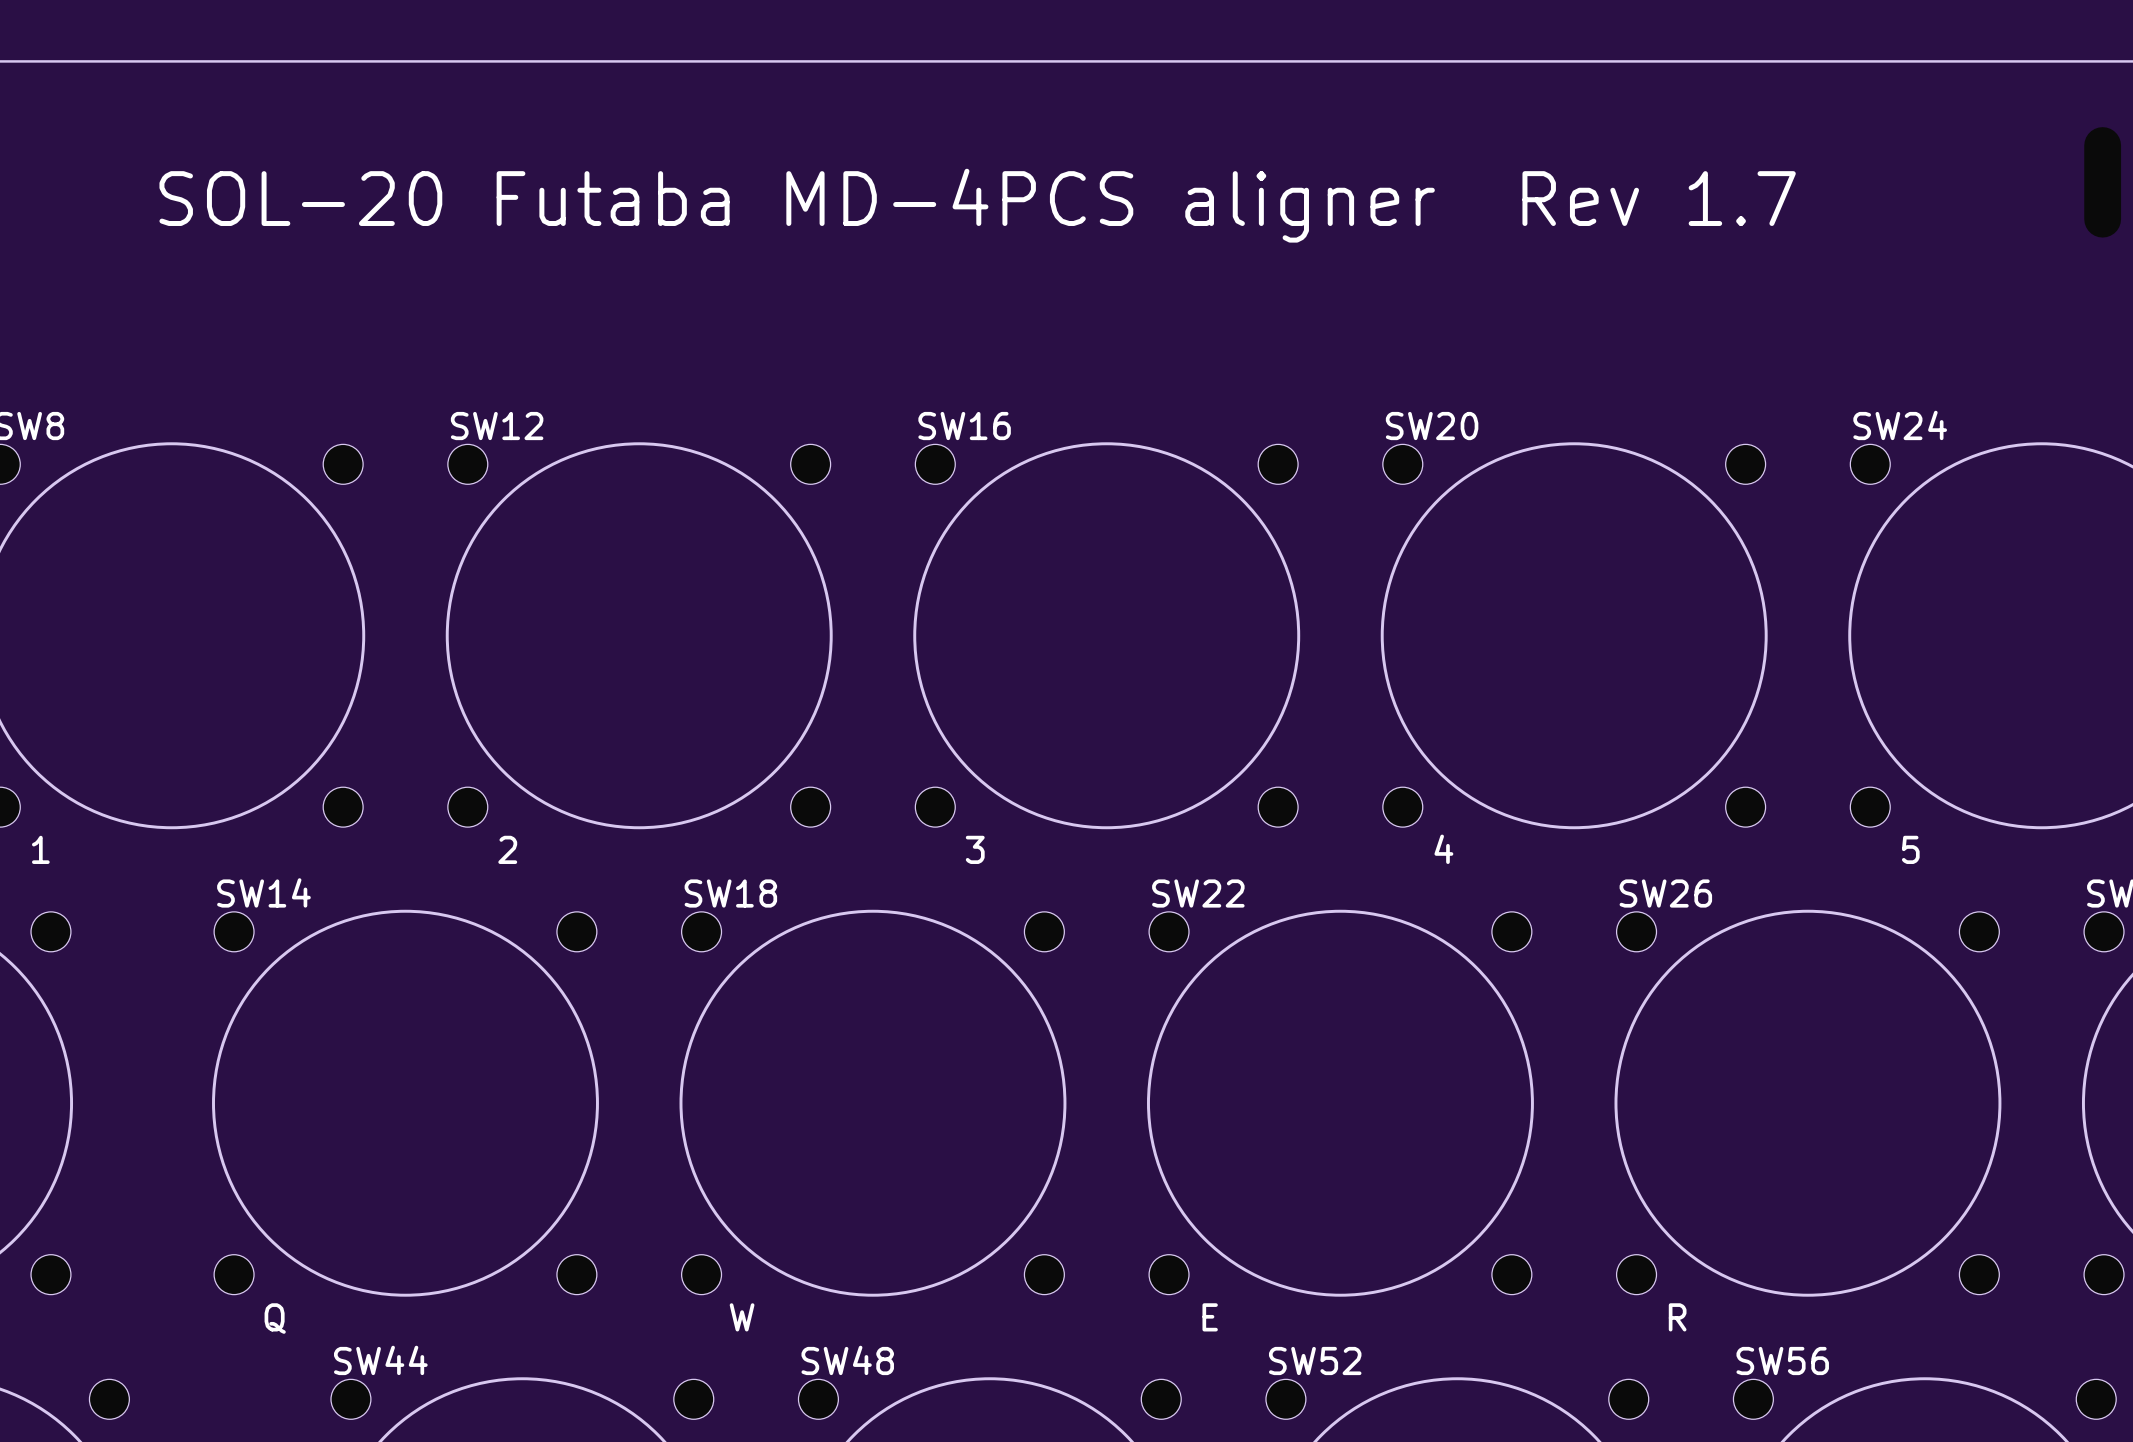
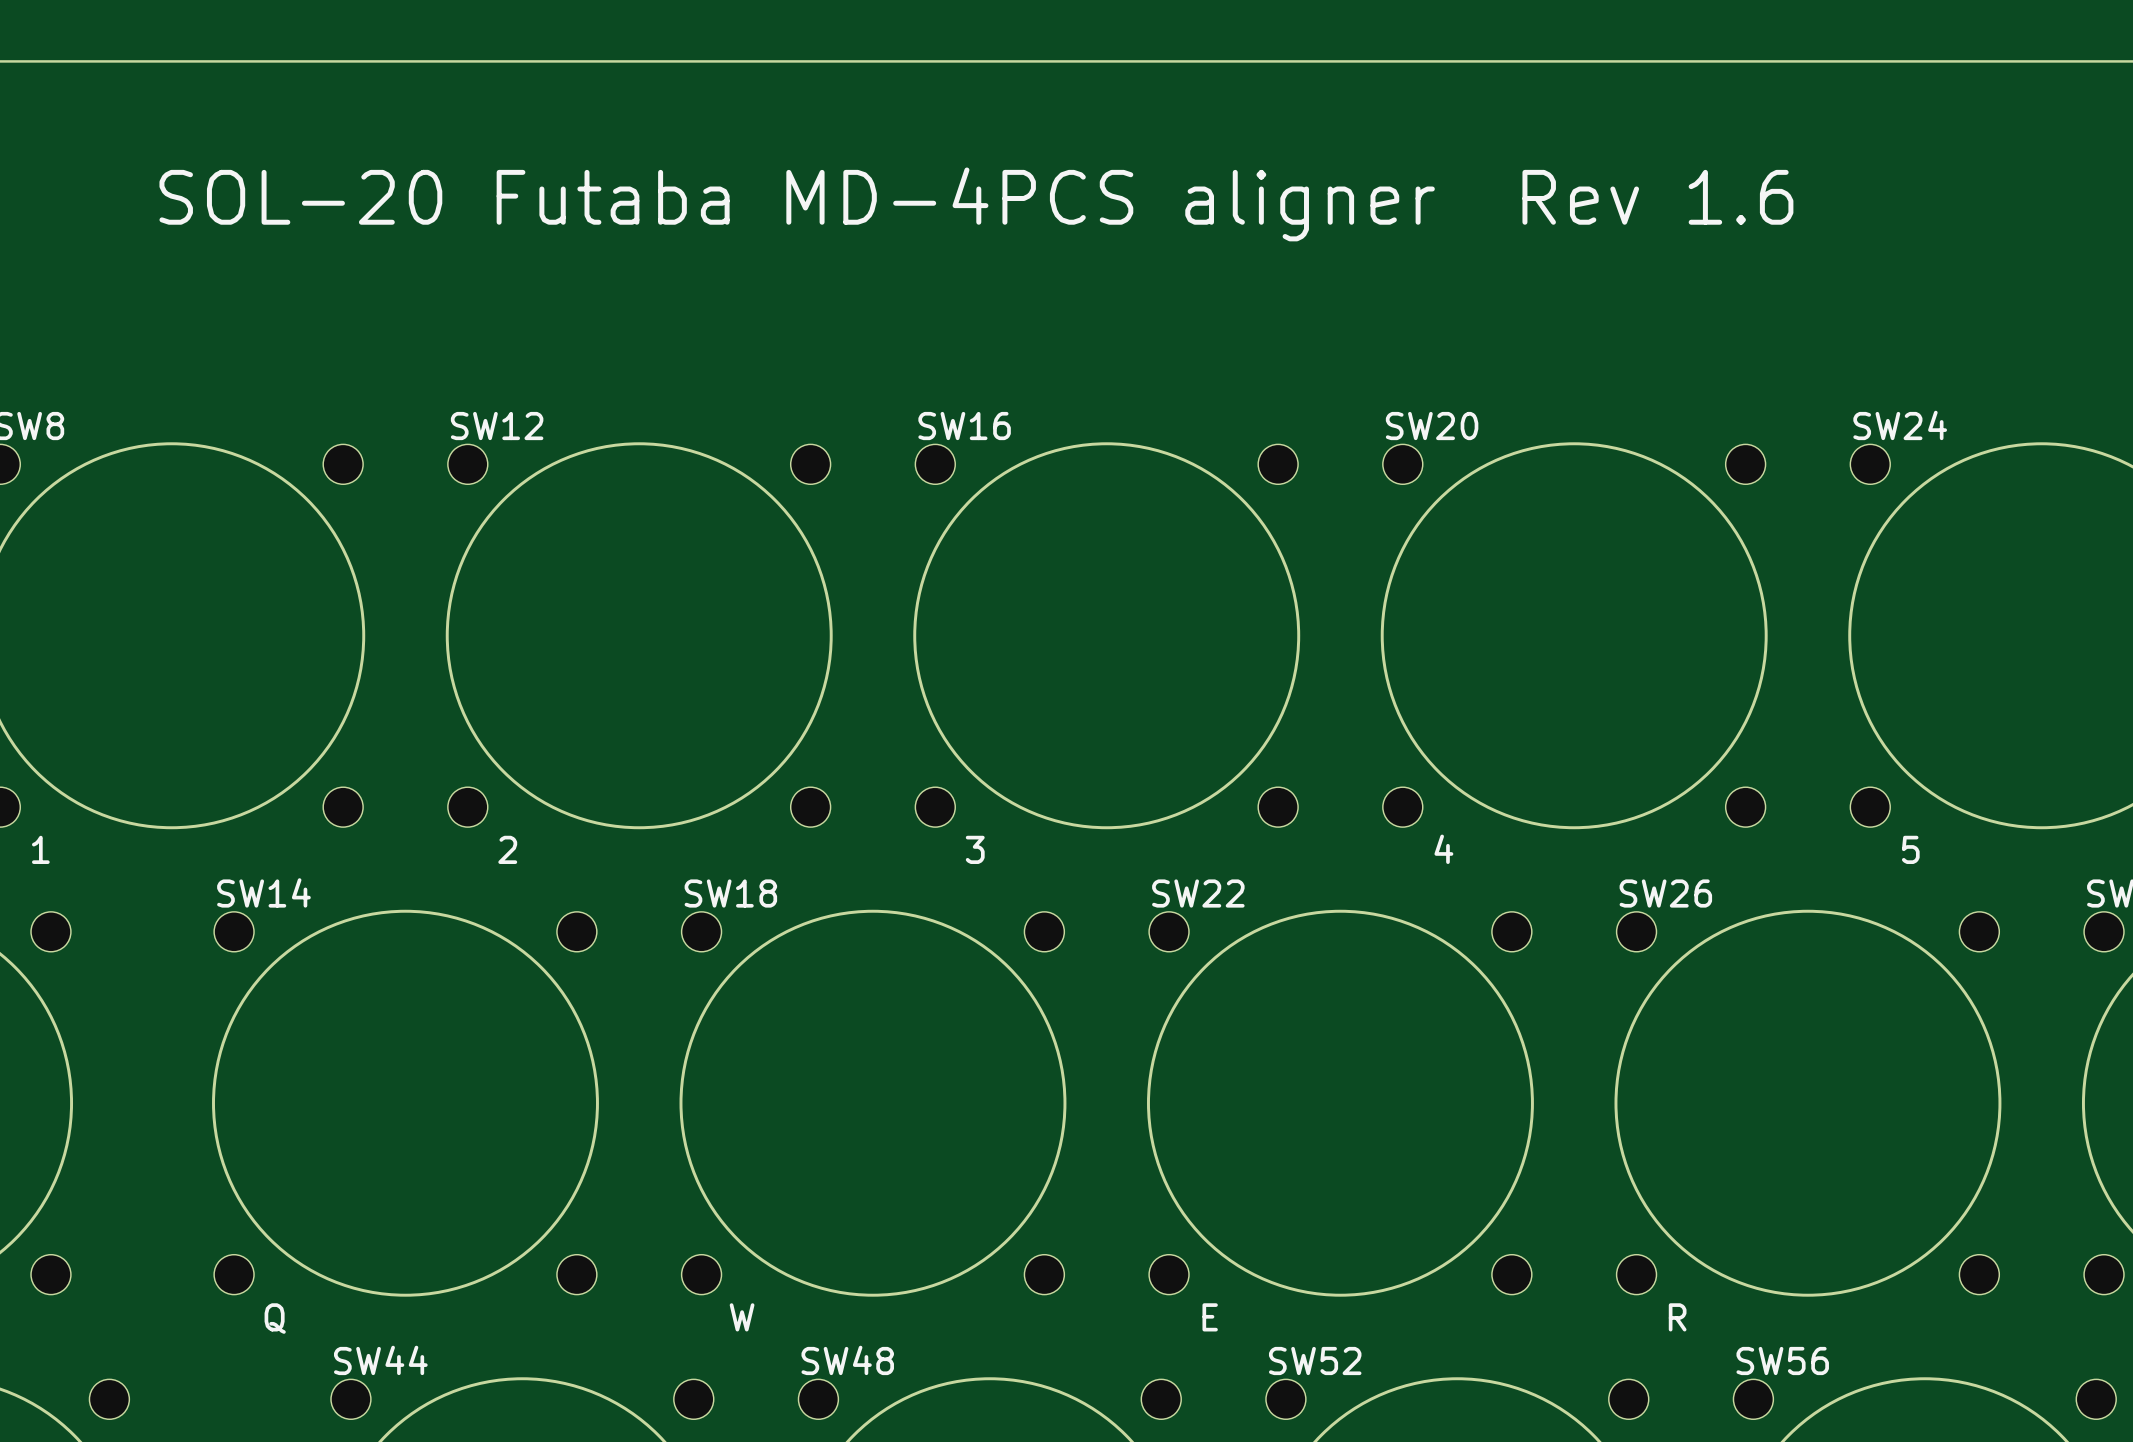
part: (2102, 182) -> none
text: SOL-20 Futaba MD-4PCS aligner Rev 1.7 (977, 205) -> SOL-20 Futaba MD-4PCS aligner Rev 1.6 (976, 204)

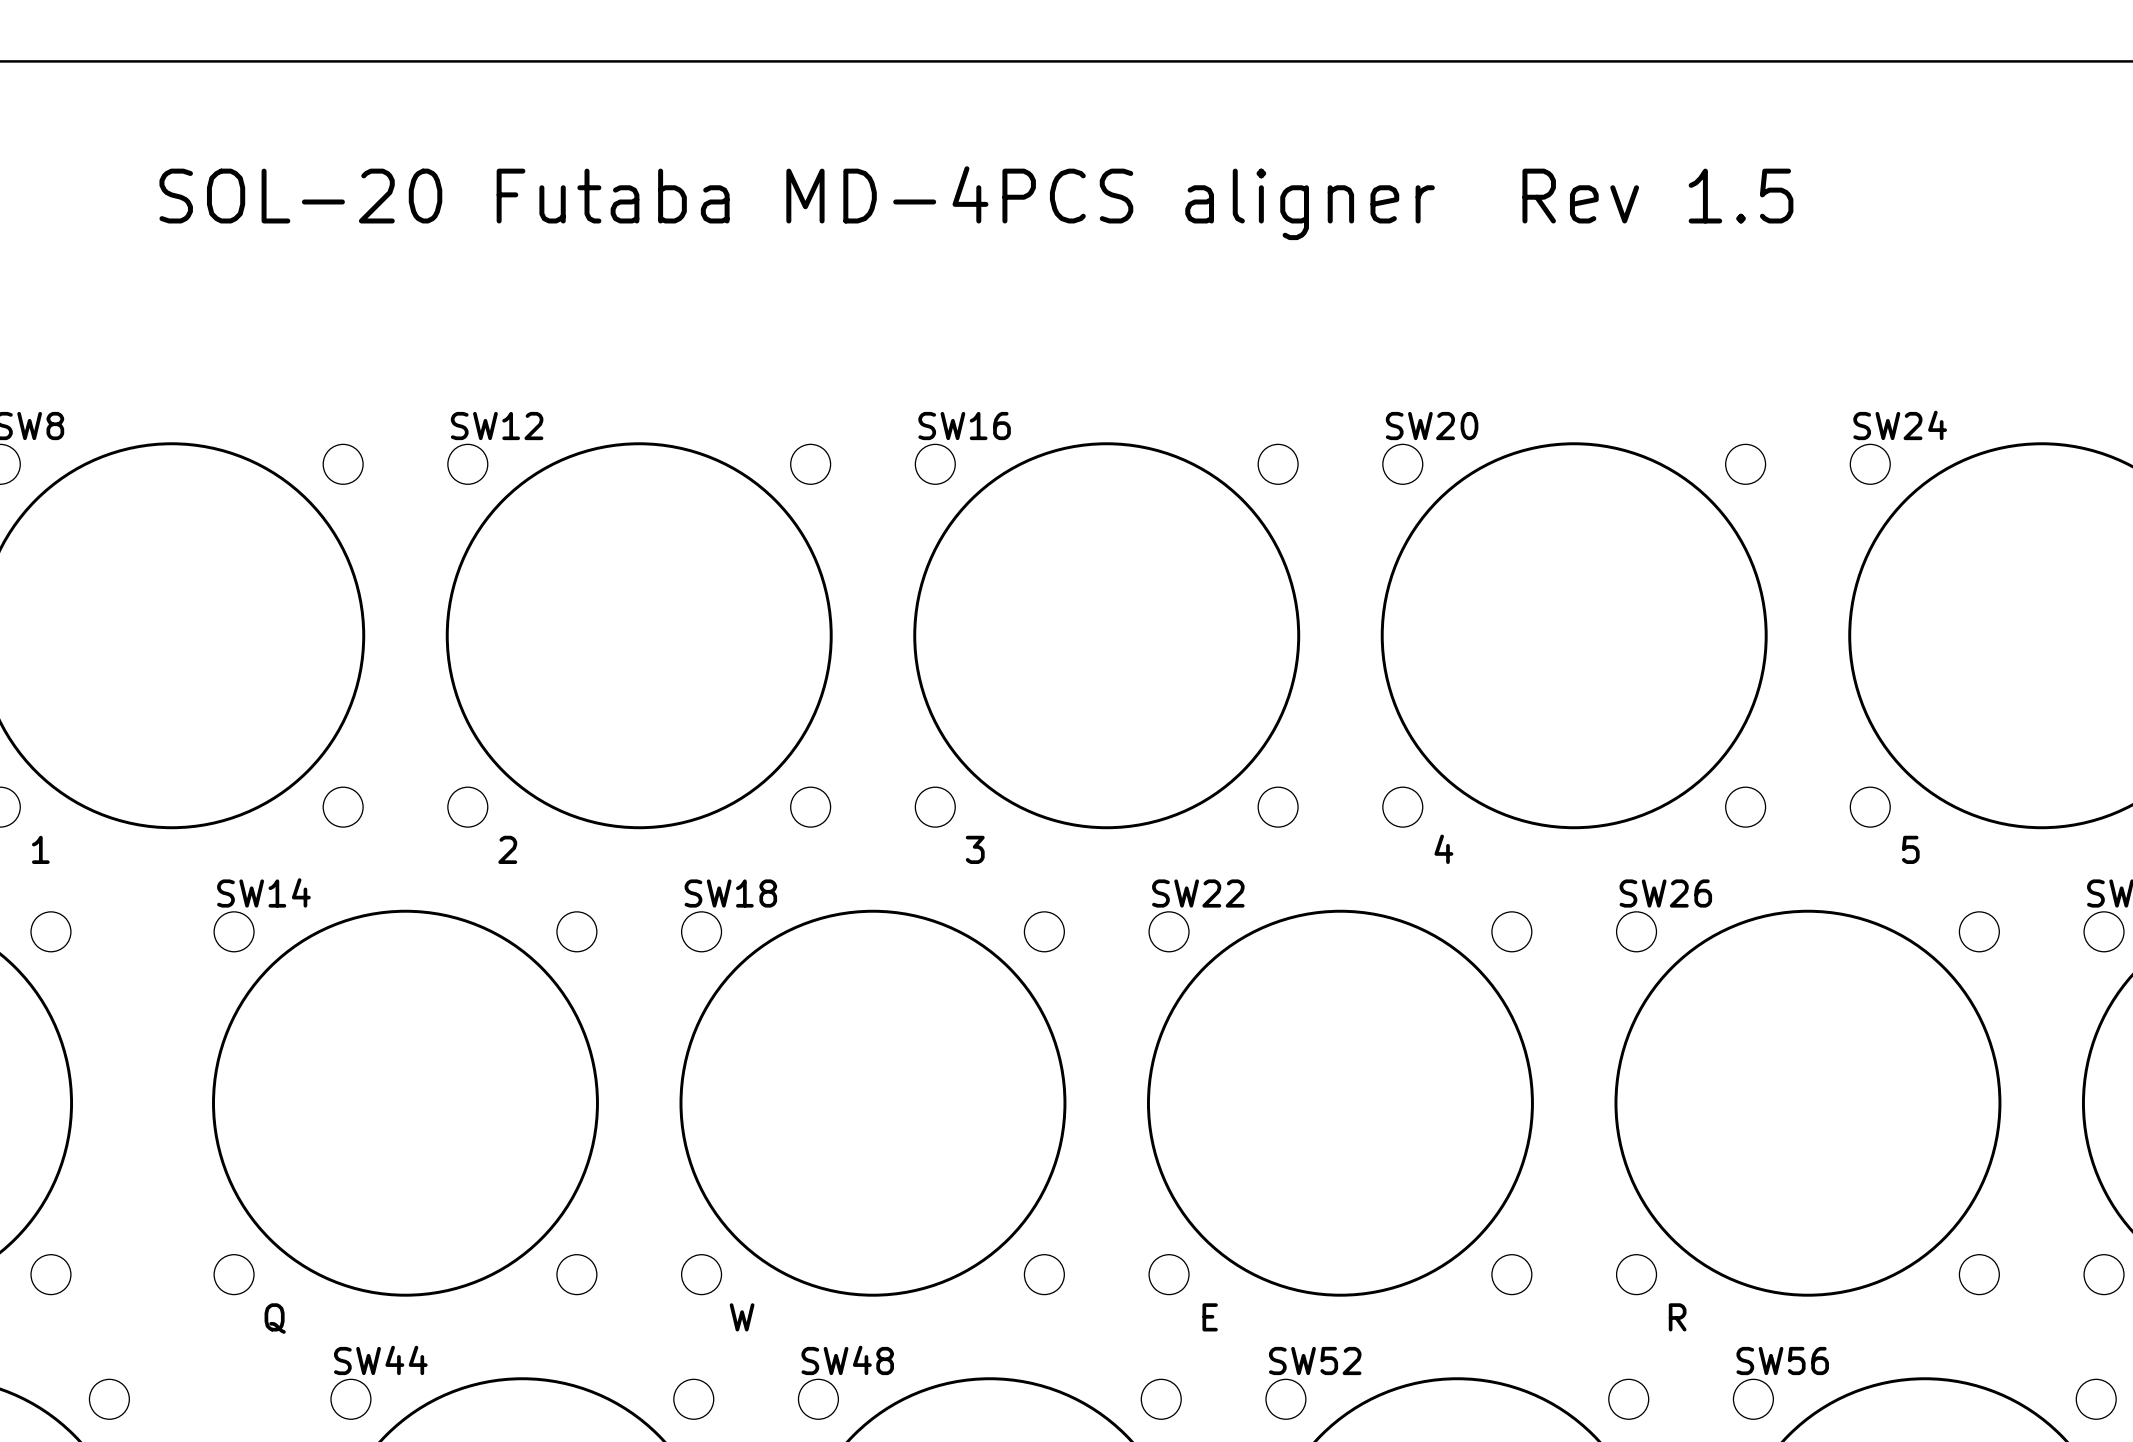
text: SOL-20 Futaba MD-4PCS aligner Rev 1.6 (976, 204) -> SOL-20 Futaba MD-4PCS aligner Rev 1.5 (976, 203)

